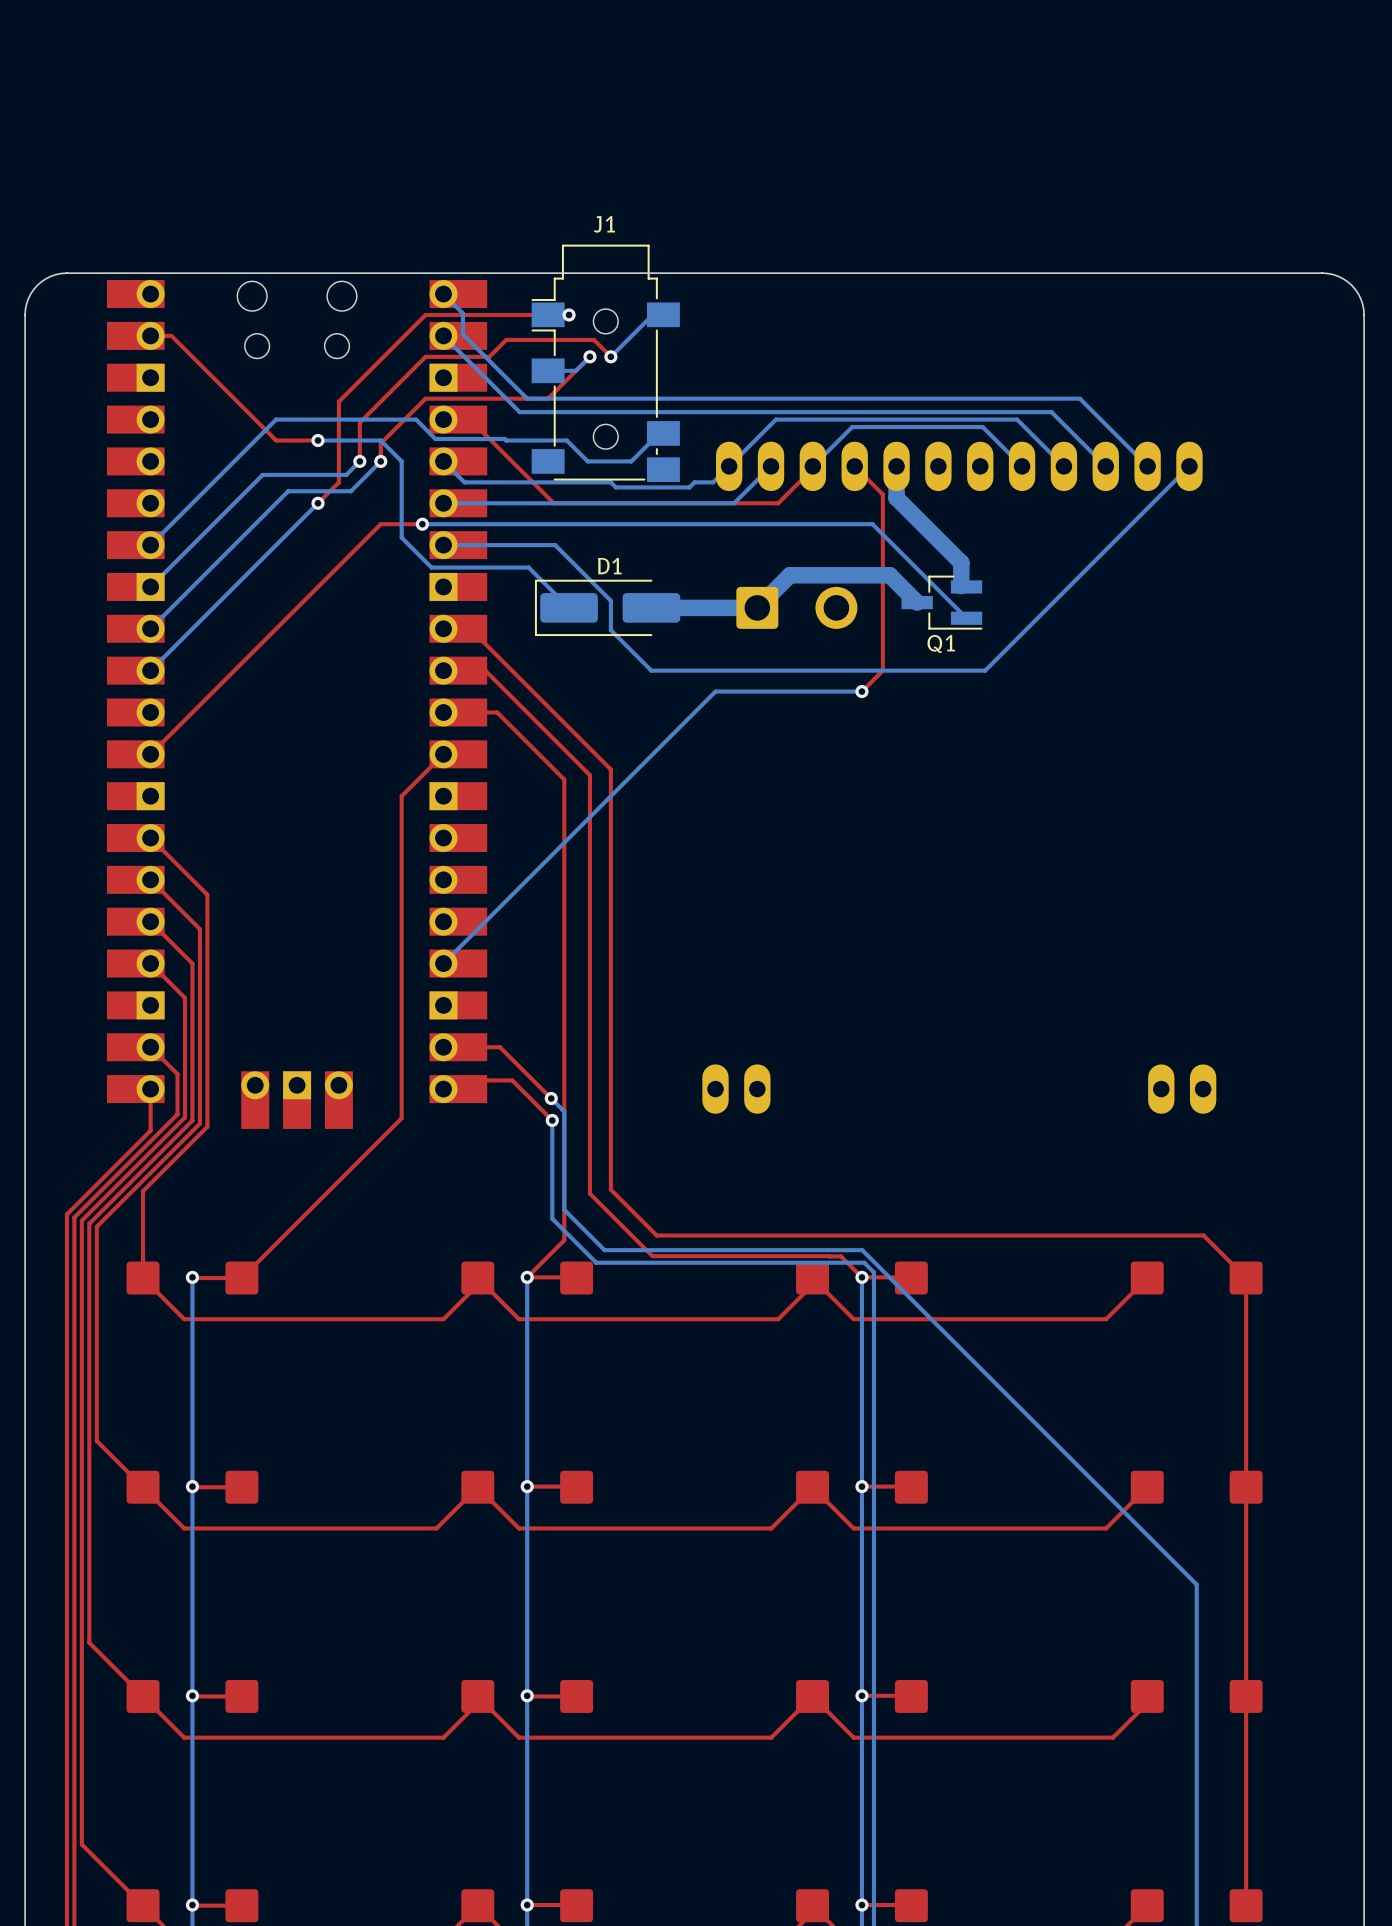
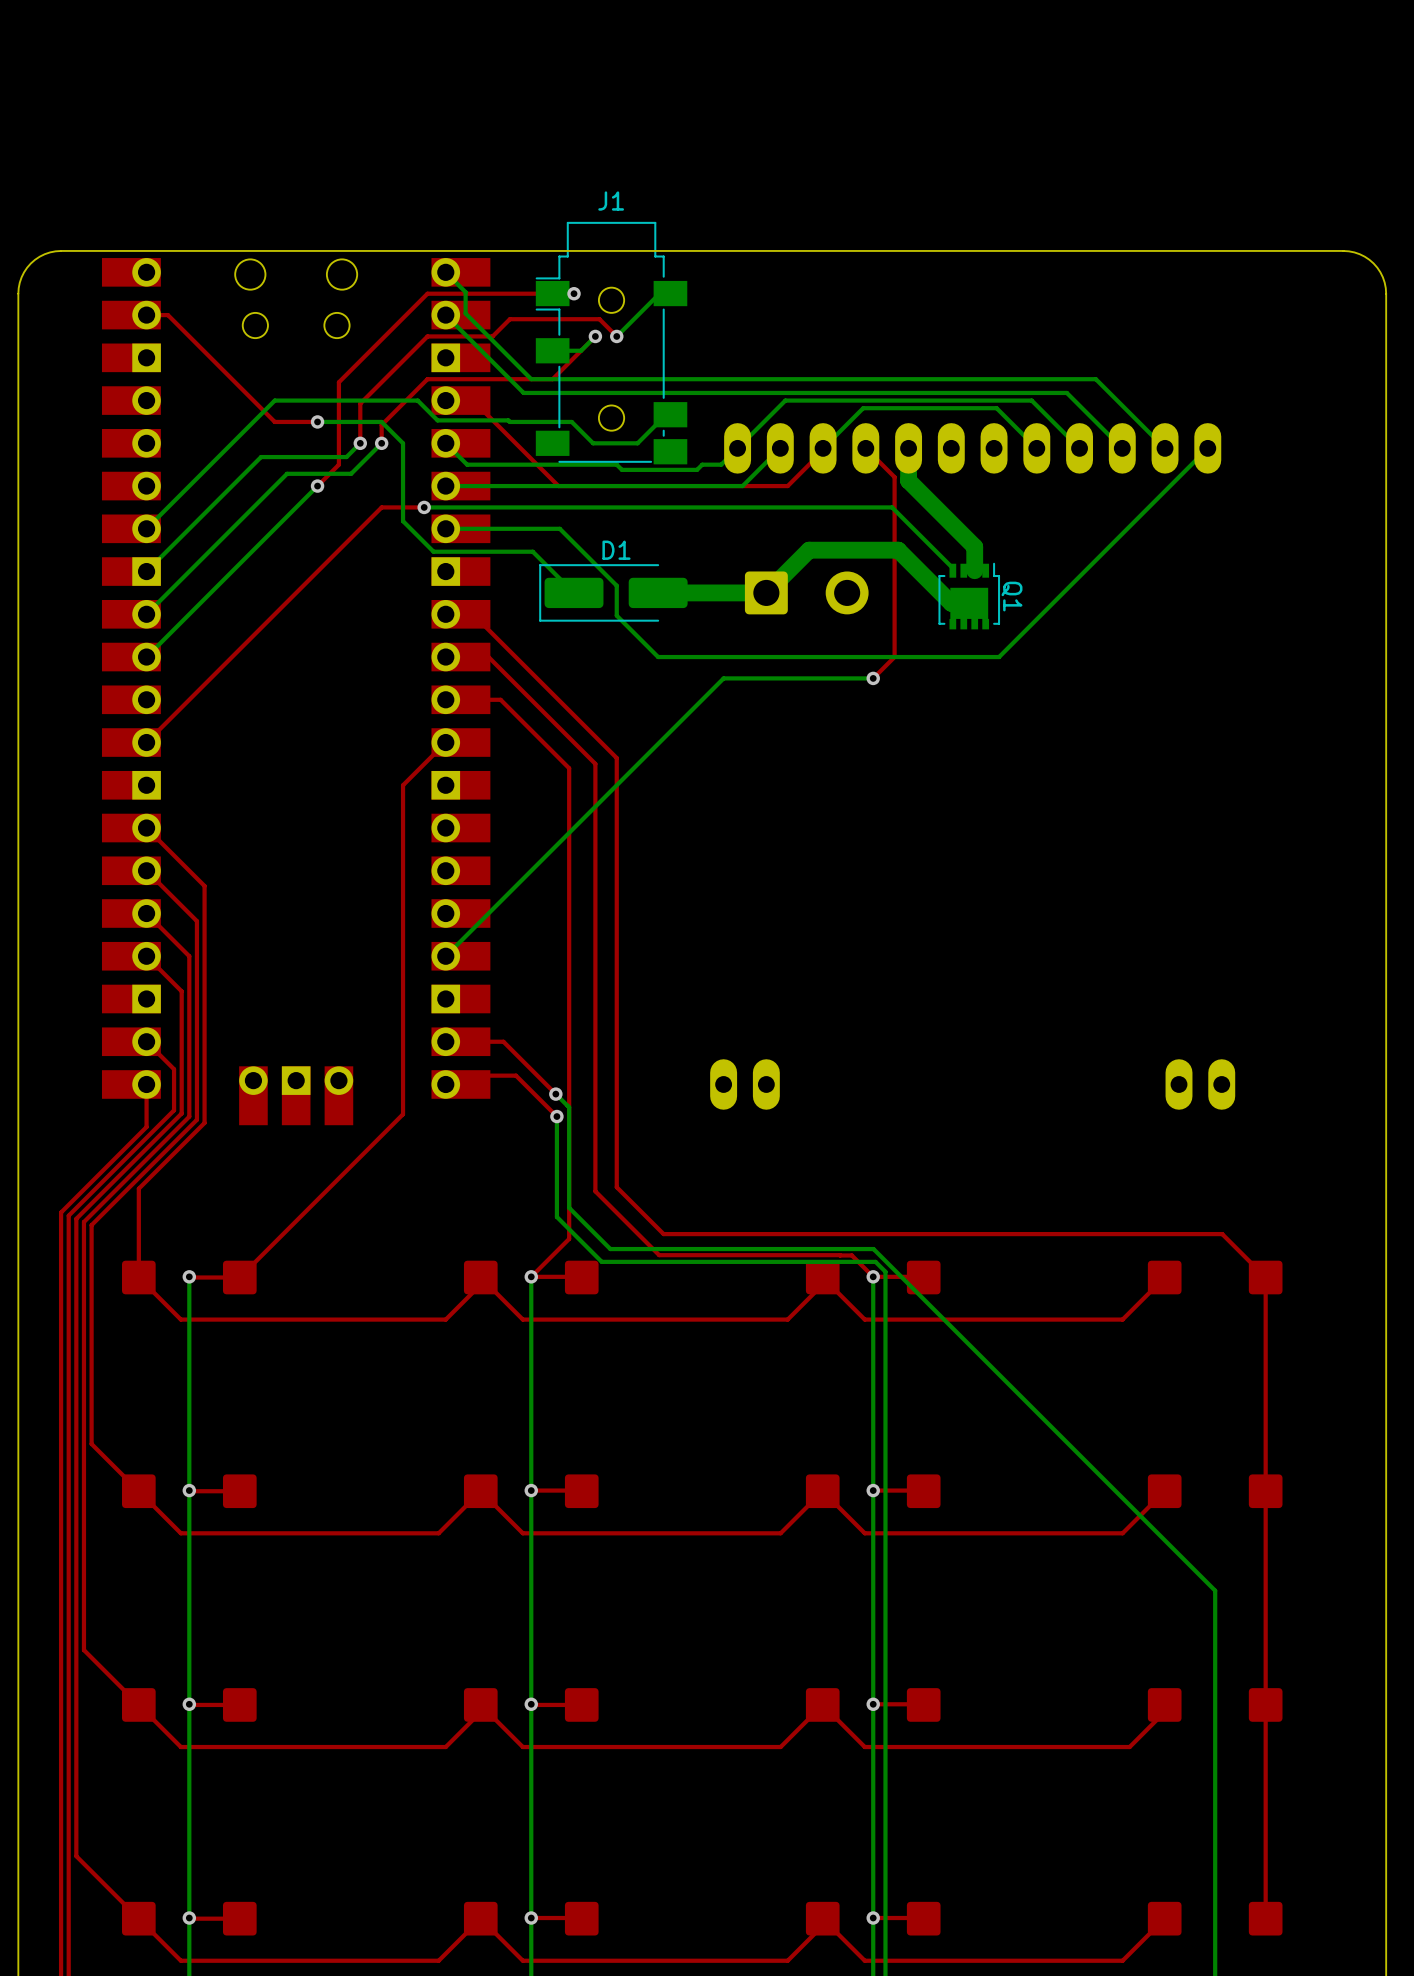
bottom track: (872, 524) (966, 618) -> (884, 507) (892, 507) (952, 568) (952, 570)
bottom track: (789, 575) (889, 575) (917, 602) -> (799, 559) (809, 550) (898, 550) (951, 603) (969, 603)
Q1 footprint: [901, 575, 983, 630] -> [938, 562, 1001, 630]
Q1 name position: Q1 (941, 643) -> Q1 (1011, 596)

